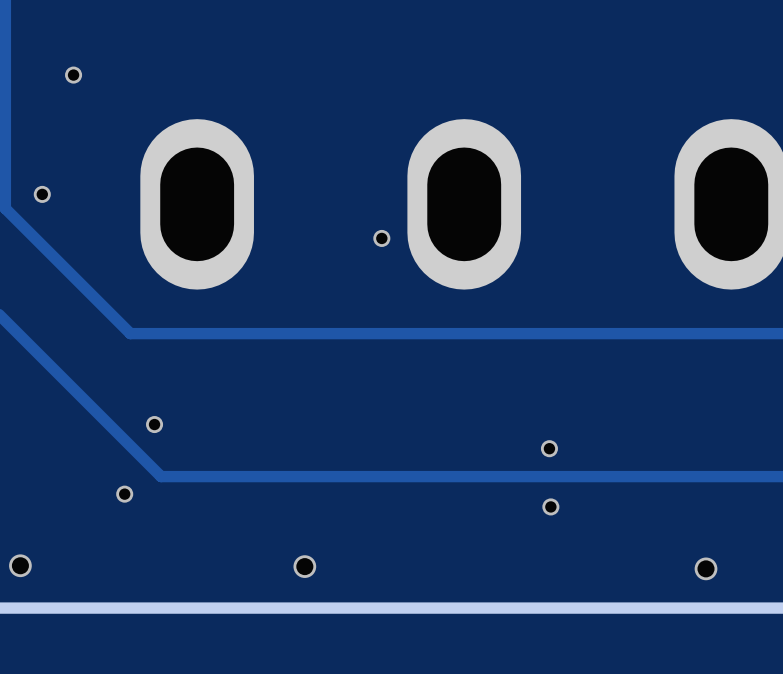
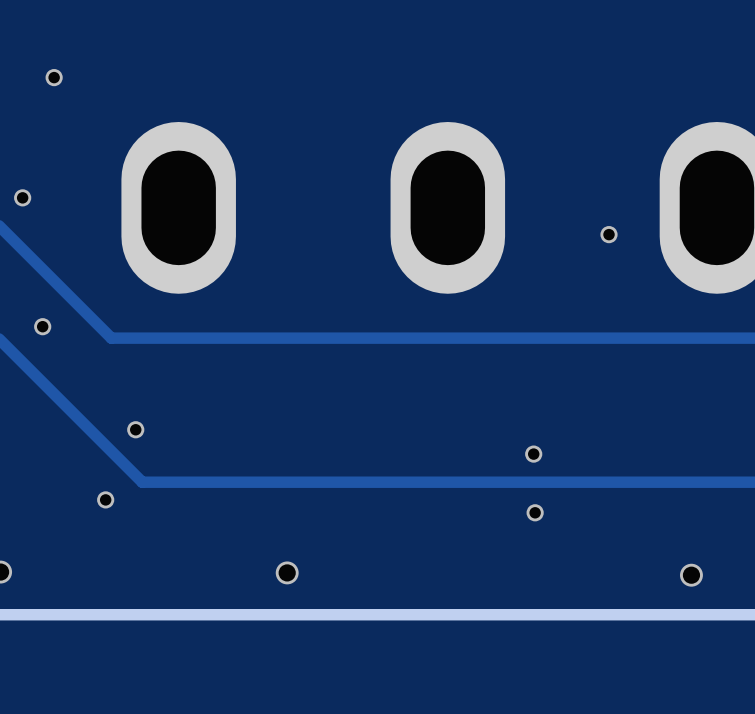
via: none -> (609, 234)
via: (381, 238) -> none
via: none -> (42, 326)

